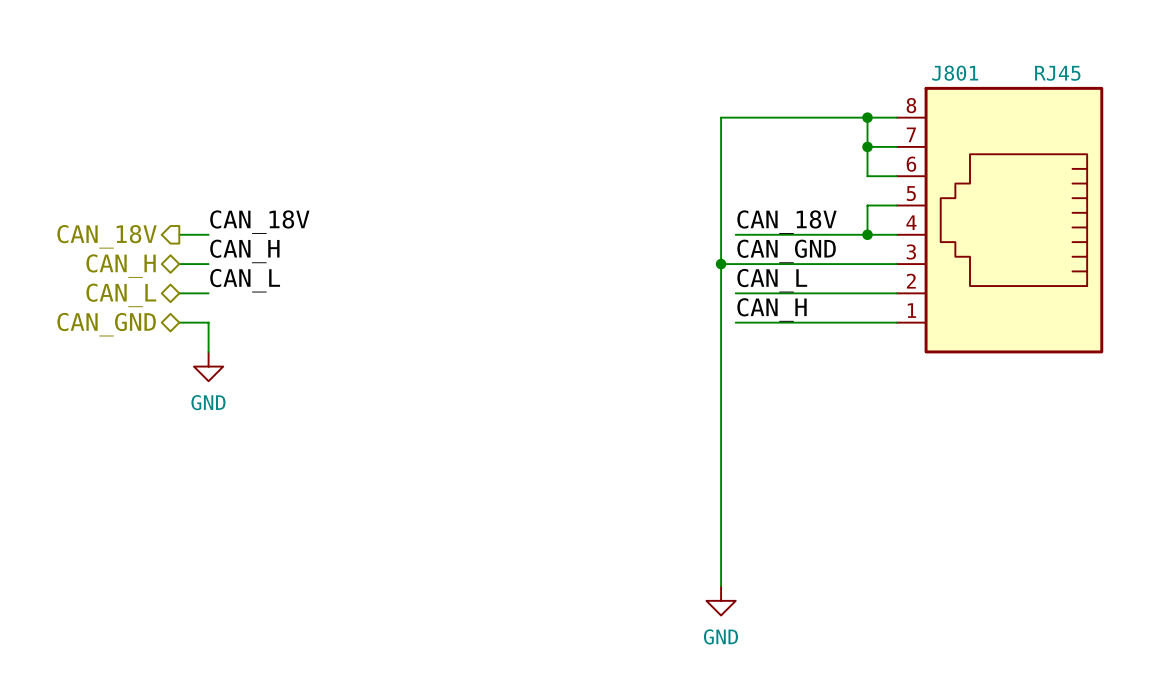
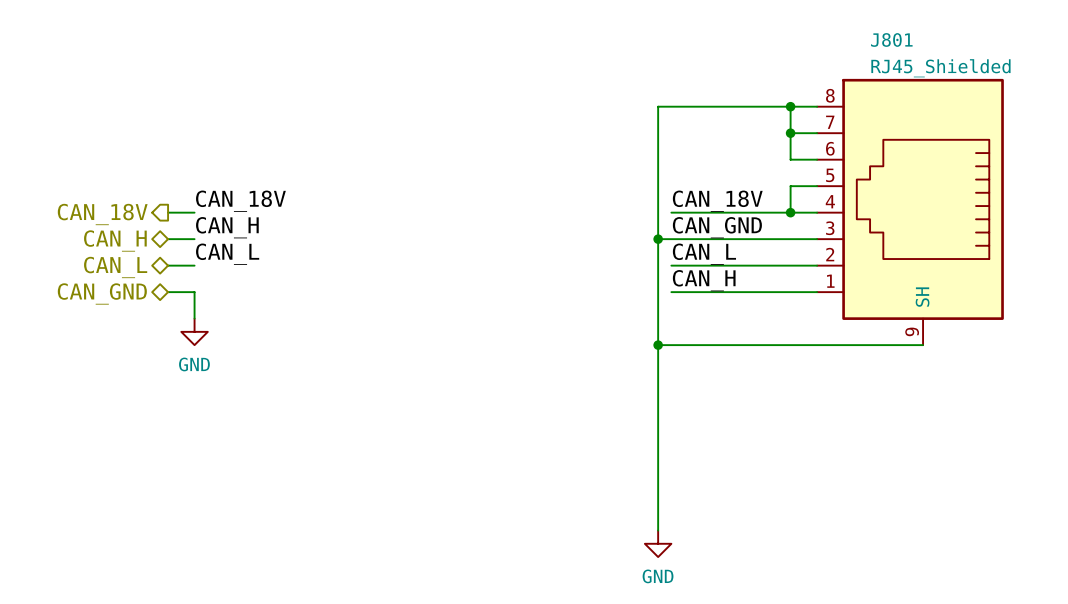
J801 name position: J801 (955, 73) -> J801 (891, 39)
J801 value: RJ45 (1057, 73) -> RJ45_Shielded (940, 68)
J801 symbol: [896, 86, 1104, 354] -> [817, 78, 1004, 346]
wire: none -> (658, 345) (923, 345)
junction: none -> (658, 345)

